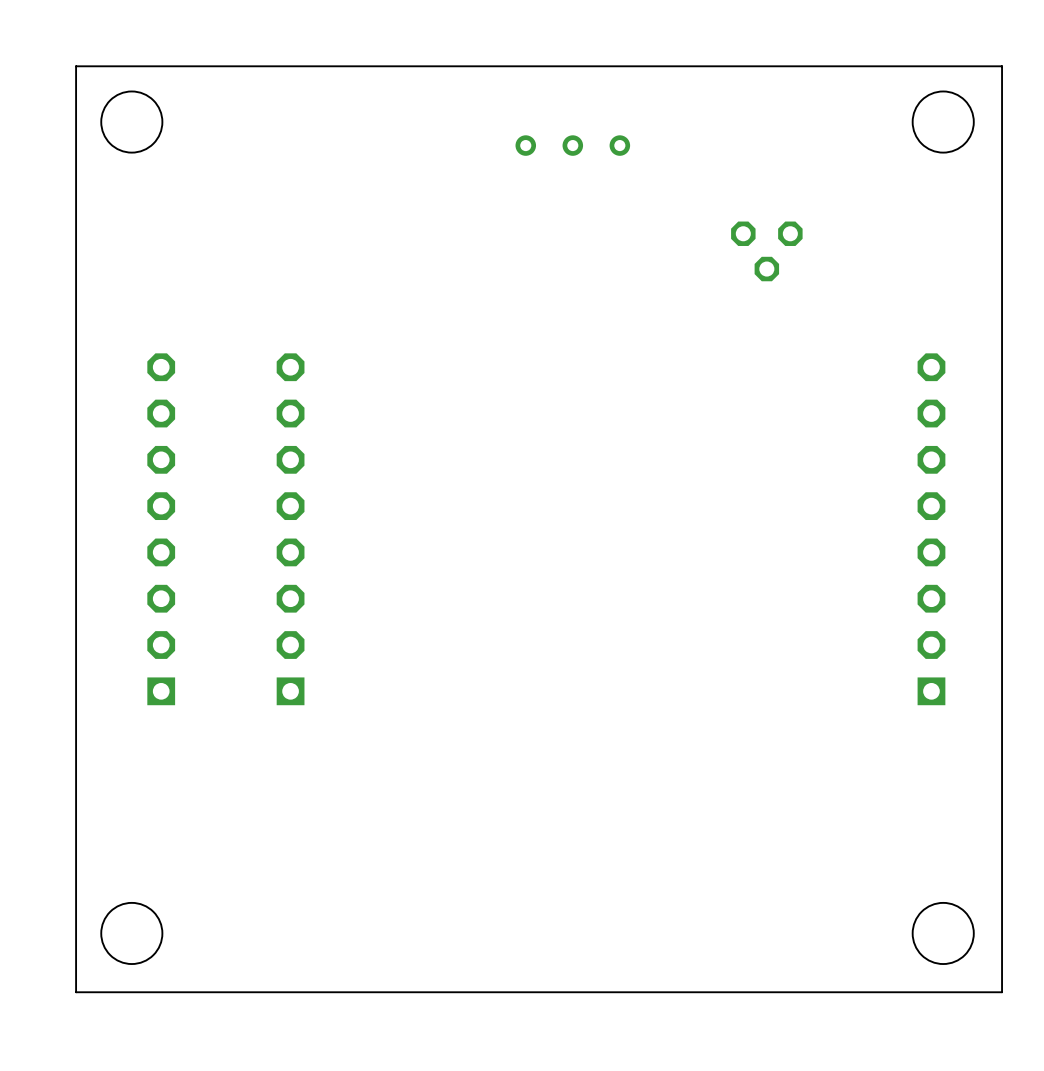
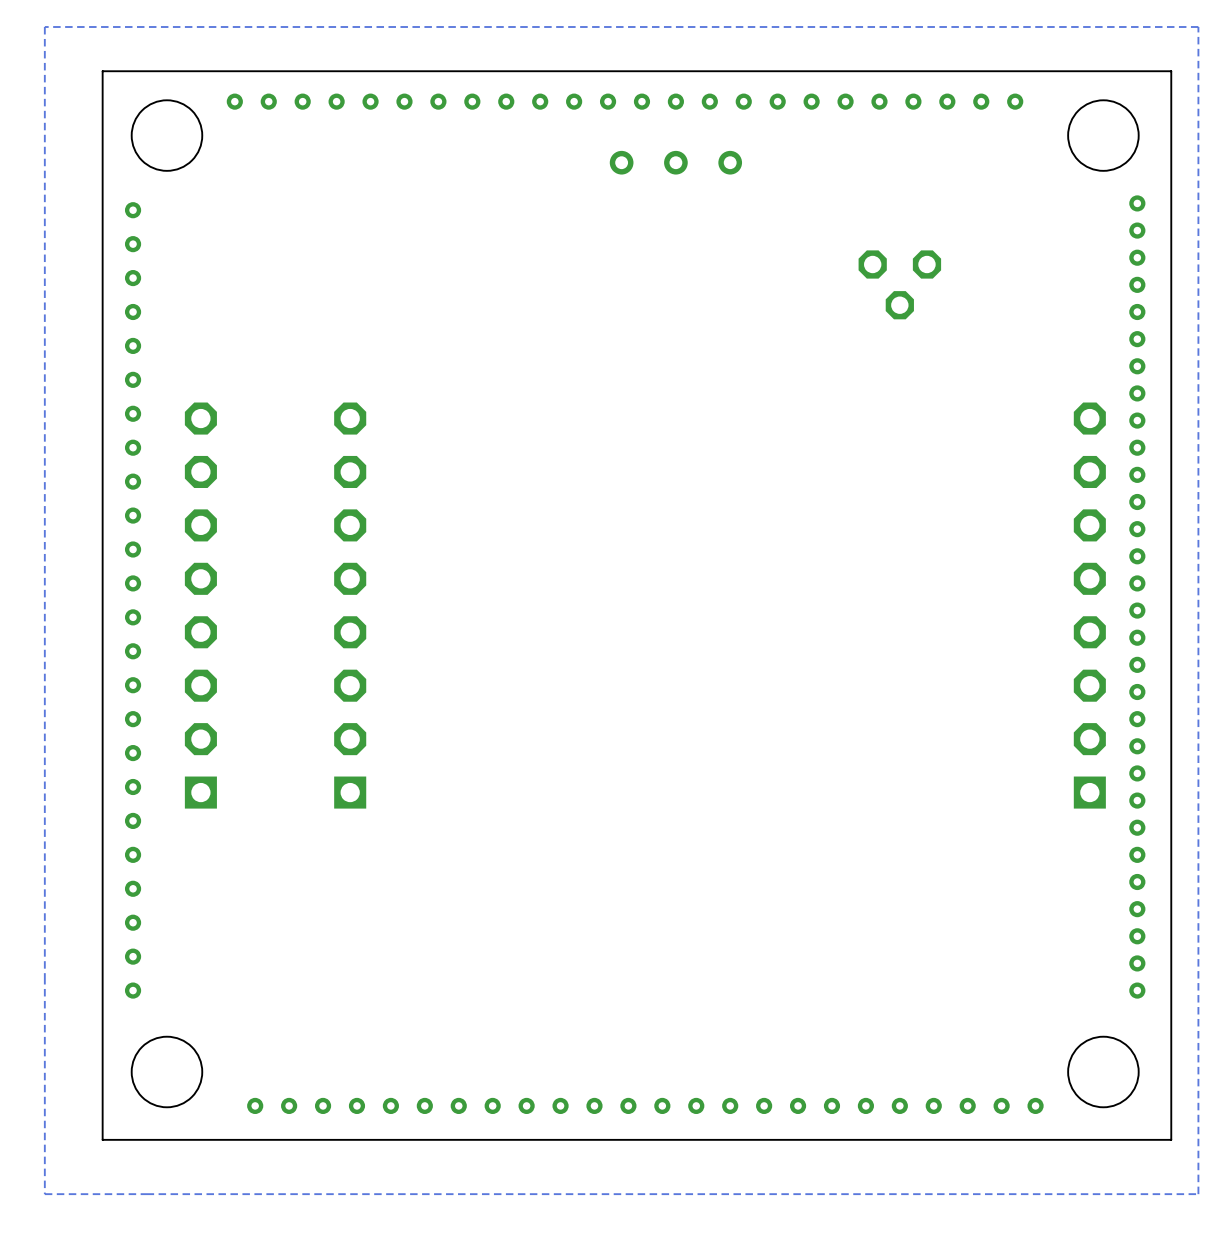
zone outline: none -> (1198, 26) (44, 26) (44, 1194) (1198, 1194) (1198, 26)
via: none -> (234, 101)
via: none -> (268, 101)
via: none -> (302, 101)
via: none -> (336, 101)
via: none -> (370, 101)
via: none -> (404, 101)
via: none -> (438, 101)
via: none -> (472, 101)
via: none -> (506, 101)
via: none -> (540, 101)
via: none -> (574, 101)
via: none -> (608, 101)
via: none -> (641, 101)
via: none -> (675, 101)
via: none -> (709, 101)
via: none -> (743, 101)
via: none -> (777, 101)
via: none -> (811, 101)
via: none -> (845, 101)
via: none -> (879, 101)
via: none -> (913, 101)
via: none -> (947, 101)
via: none -> (981, 101)
via: none -> (1015, 101)
via: none -> (1137, 203)
via: none -> (133, 210)
via: none -> (1137, 230)
via: none -> (133, 244)
via: none -> (1137, 257)
via: none -> (133, 278)
via: none -> (1137, 284)
via: none -> (133, 312)
via: none -> (1137, 312)
via: none -> (1137, 339)
via: none -> (133, 345)
via: none -> (1137, 366)
via: none -> (133, 379)
via: none -> (1137, 393)
via: none -> (133, 413)
via: none -> (1137, 420)
via: none -> (133, 447)
via: none -> (1137, 447)
via: none -> (1137, 474)
via: none -> (133, 481)
via: none -> (1137, 502)
via: none -> (133, 515)
via: none -> (1137, 529)
via: none -> (133, 549)
via: none -> (1137, 556)
via: none -> (133, 583)
via: none -> (1137, 583)
via: none -> (1137, 610)
via: none -> (133, 617)
via: none -> (1137, 637)
via: none -> (133, 651)
via: none -> (1137, 664)
via: none -> (133, 685)
via: none -> (1137, 692)
via: none -> (133, 719)
via: none -> (1137, 719)
via: none -> (1137, 746)
via: none -> (133, 753)
via: none -> (1137, 773)
via: none -> (133, 787)
via: none -> (1137, 800)
via: none -> (133, 820)
via: none -> (1137, 827)
via: none -> (133, 854)
via: none -> (1137, 854)
via: none -> (1137, 882)
via: none -> (133, 888)
via: none -> (1137, 909)
via: none -> (133, 922)
via: none -> (1137, 936)
via: none -> (133, 956)
via: none -> (1137, 963)
via: none -> (133, 990)
via: none -> (1137, 990)
via: none -> (255, 1105)
via: none -> (289, 1105)
via: none -> (323, 1105)
via: none -> (356, 1105)
via: none -> (390, 1105)
via: none -> (424, 1105)
via: none -> (458, 1105)
via: none -> (492, 1105)
via: none -> (526, 1105)
via: none -> (560, 1105)
via: none -> (594, 1105)
via: none -> (628, 1105)
via: none -> (662, 1105)
via: none -> (696, 1105)
via: none -> (730, 1105)
via: none -> (764, 1105)
via: none -> (798, 1105)
via: none -> (831, 1105)
via: none -> (865, 1105)
via: none -> (899, 1105)
via: none -> (933, 1105)
via: none -> (967, 1105)
via: none -> (1001, 1105)
via: none -> (1035, 1105)

